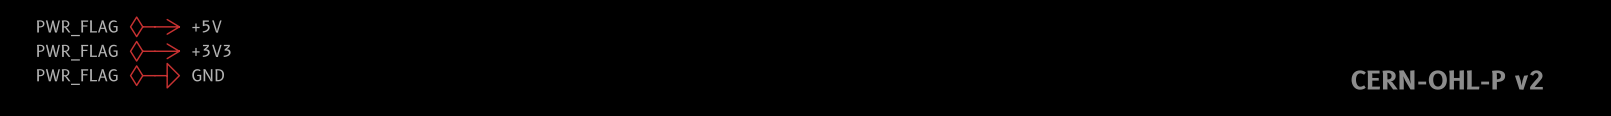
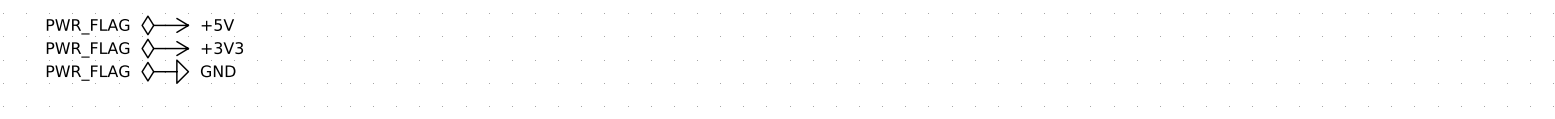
text: CERN-OHL-P v2 (1447, 80) -> none

